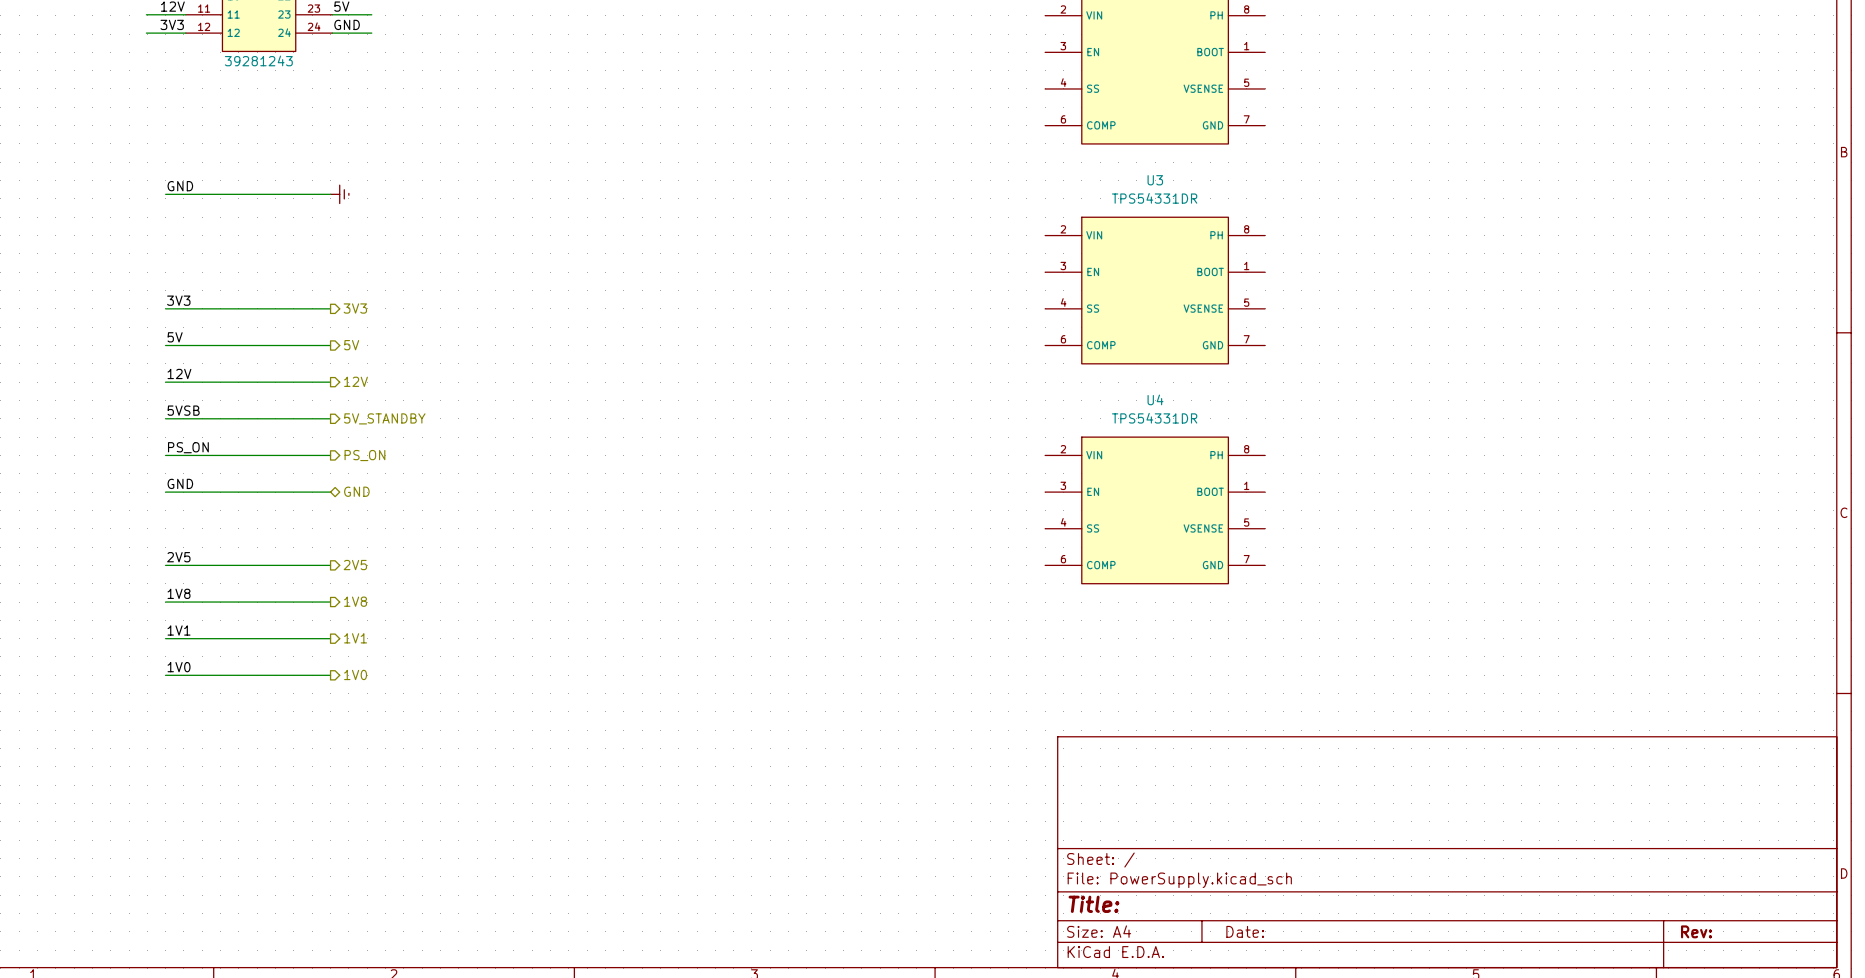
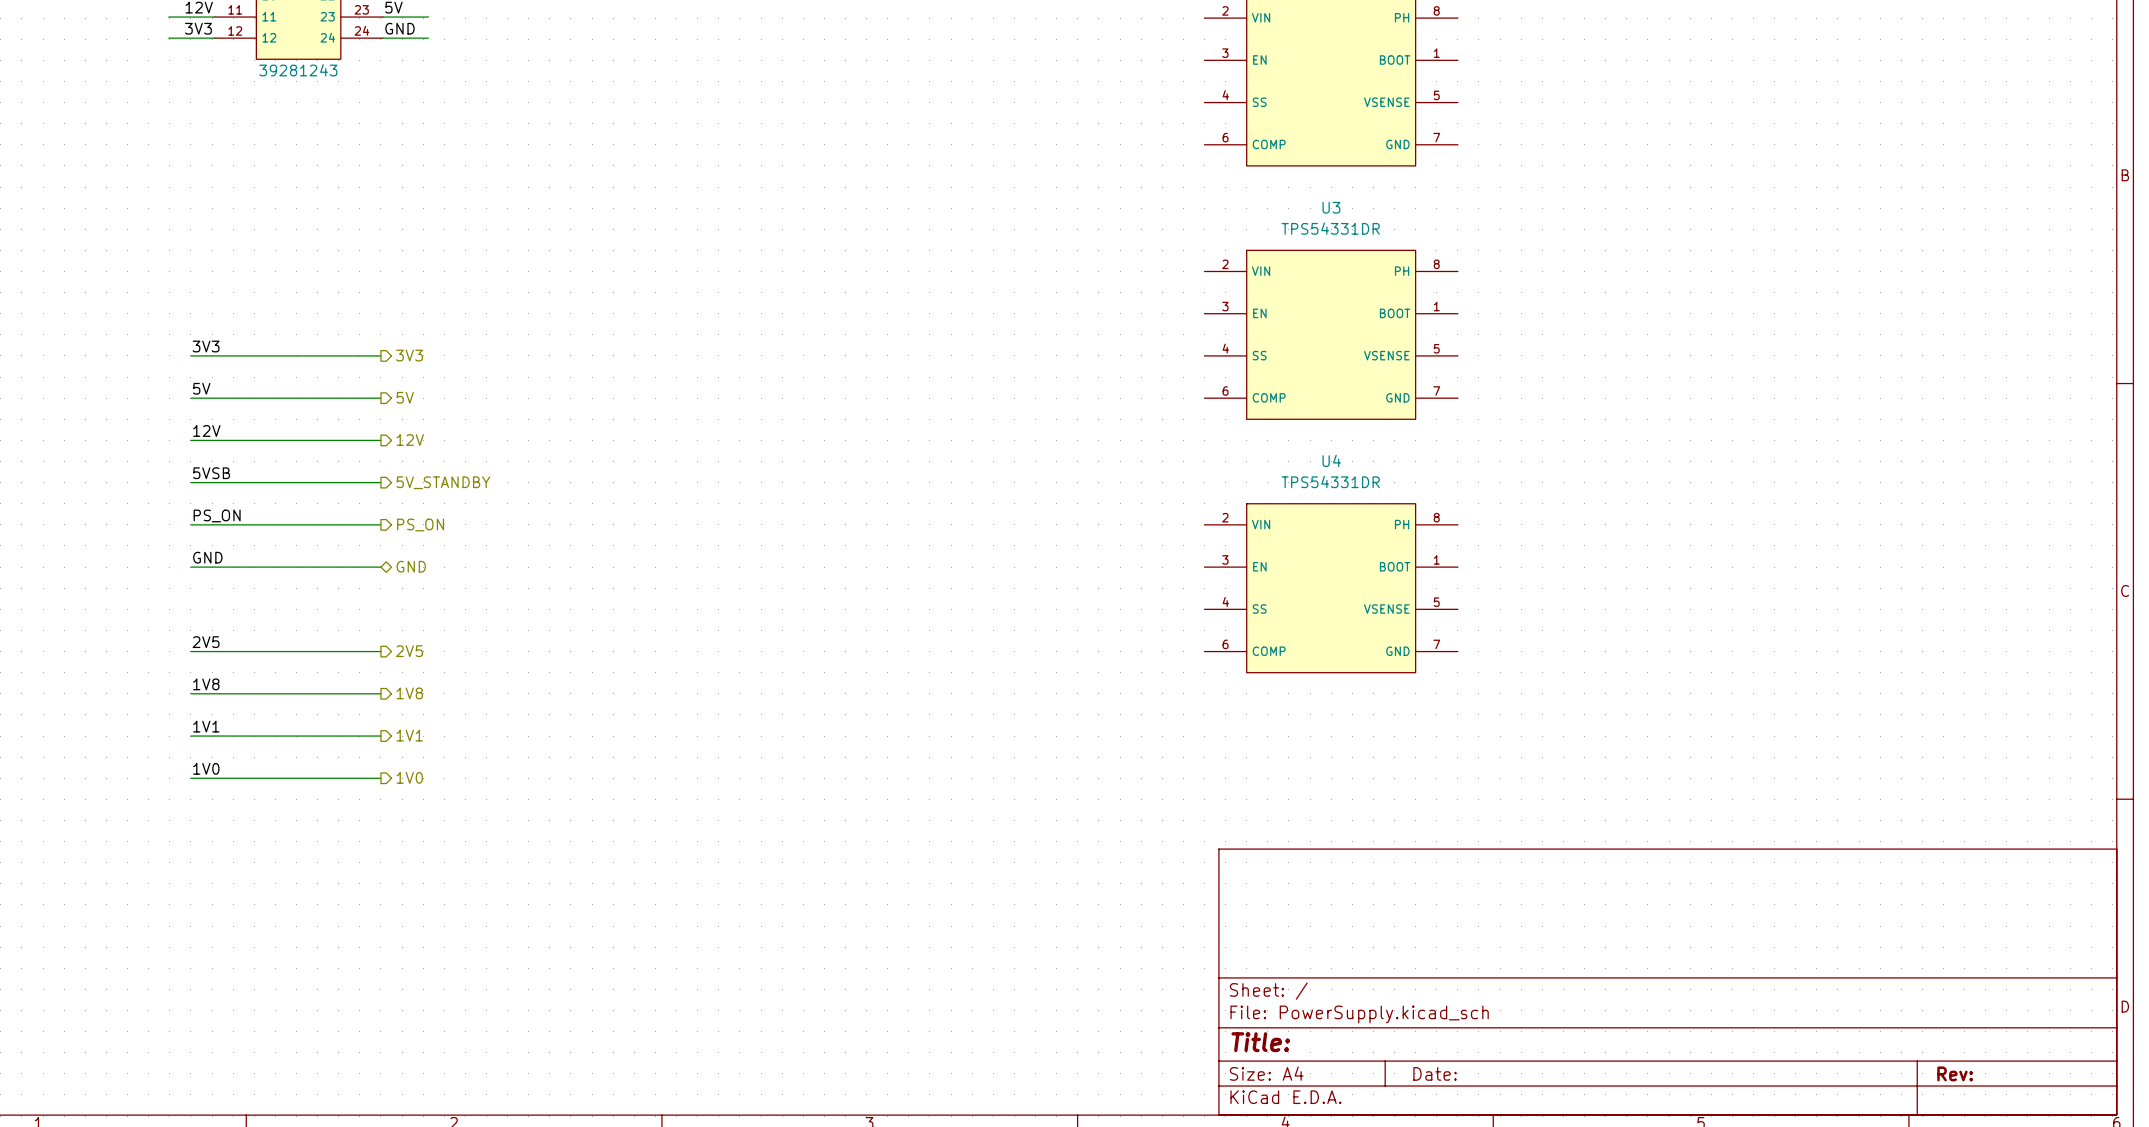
label: GND (180, 186) -> none
wire: (165, 194) (330, 194) -> none
power symbol: (339, 194) -> none

